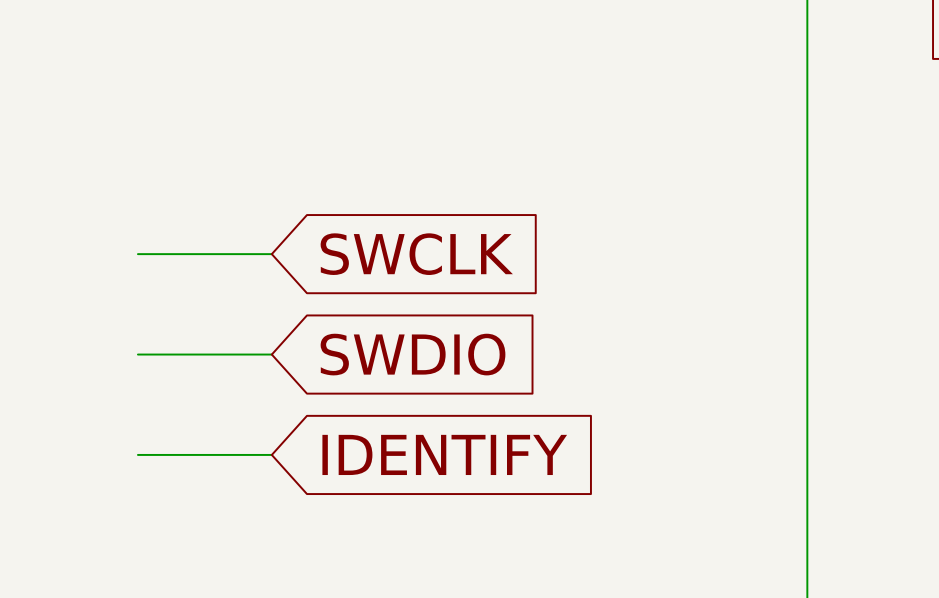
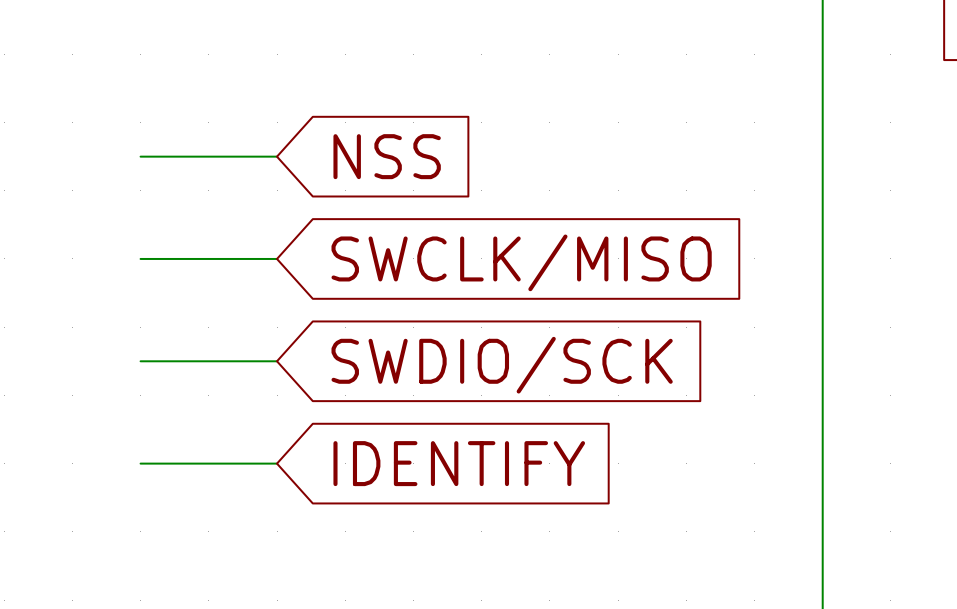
wire: none -> (140, 156) (277, 156)
global label: none -> NSS (387, 156)
global label: SWCLK (416, 254) -> SWCLK/MISO (521, 262)
global label: SWDIO (413, 354) -> SWDIO/SCK (502, 365)

